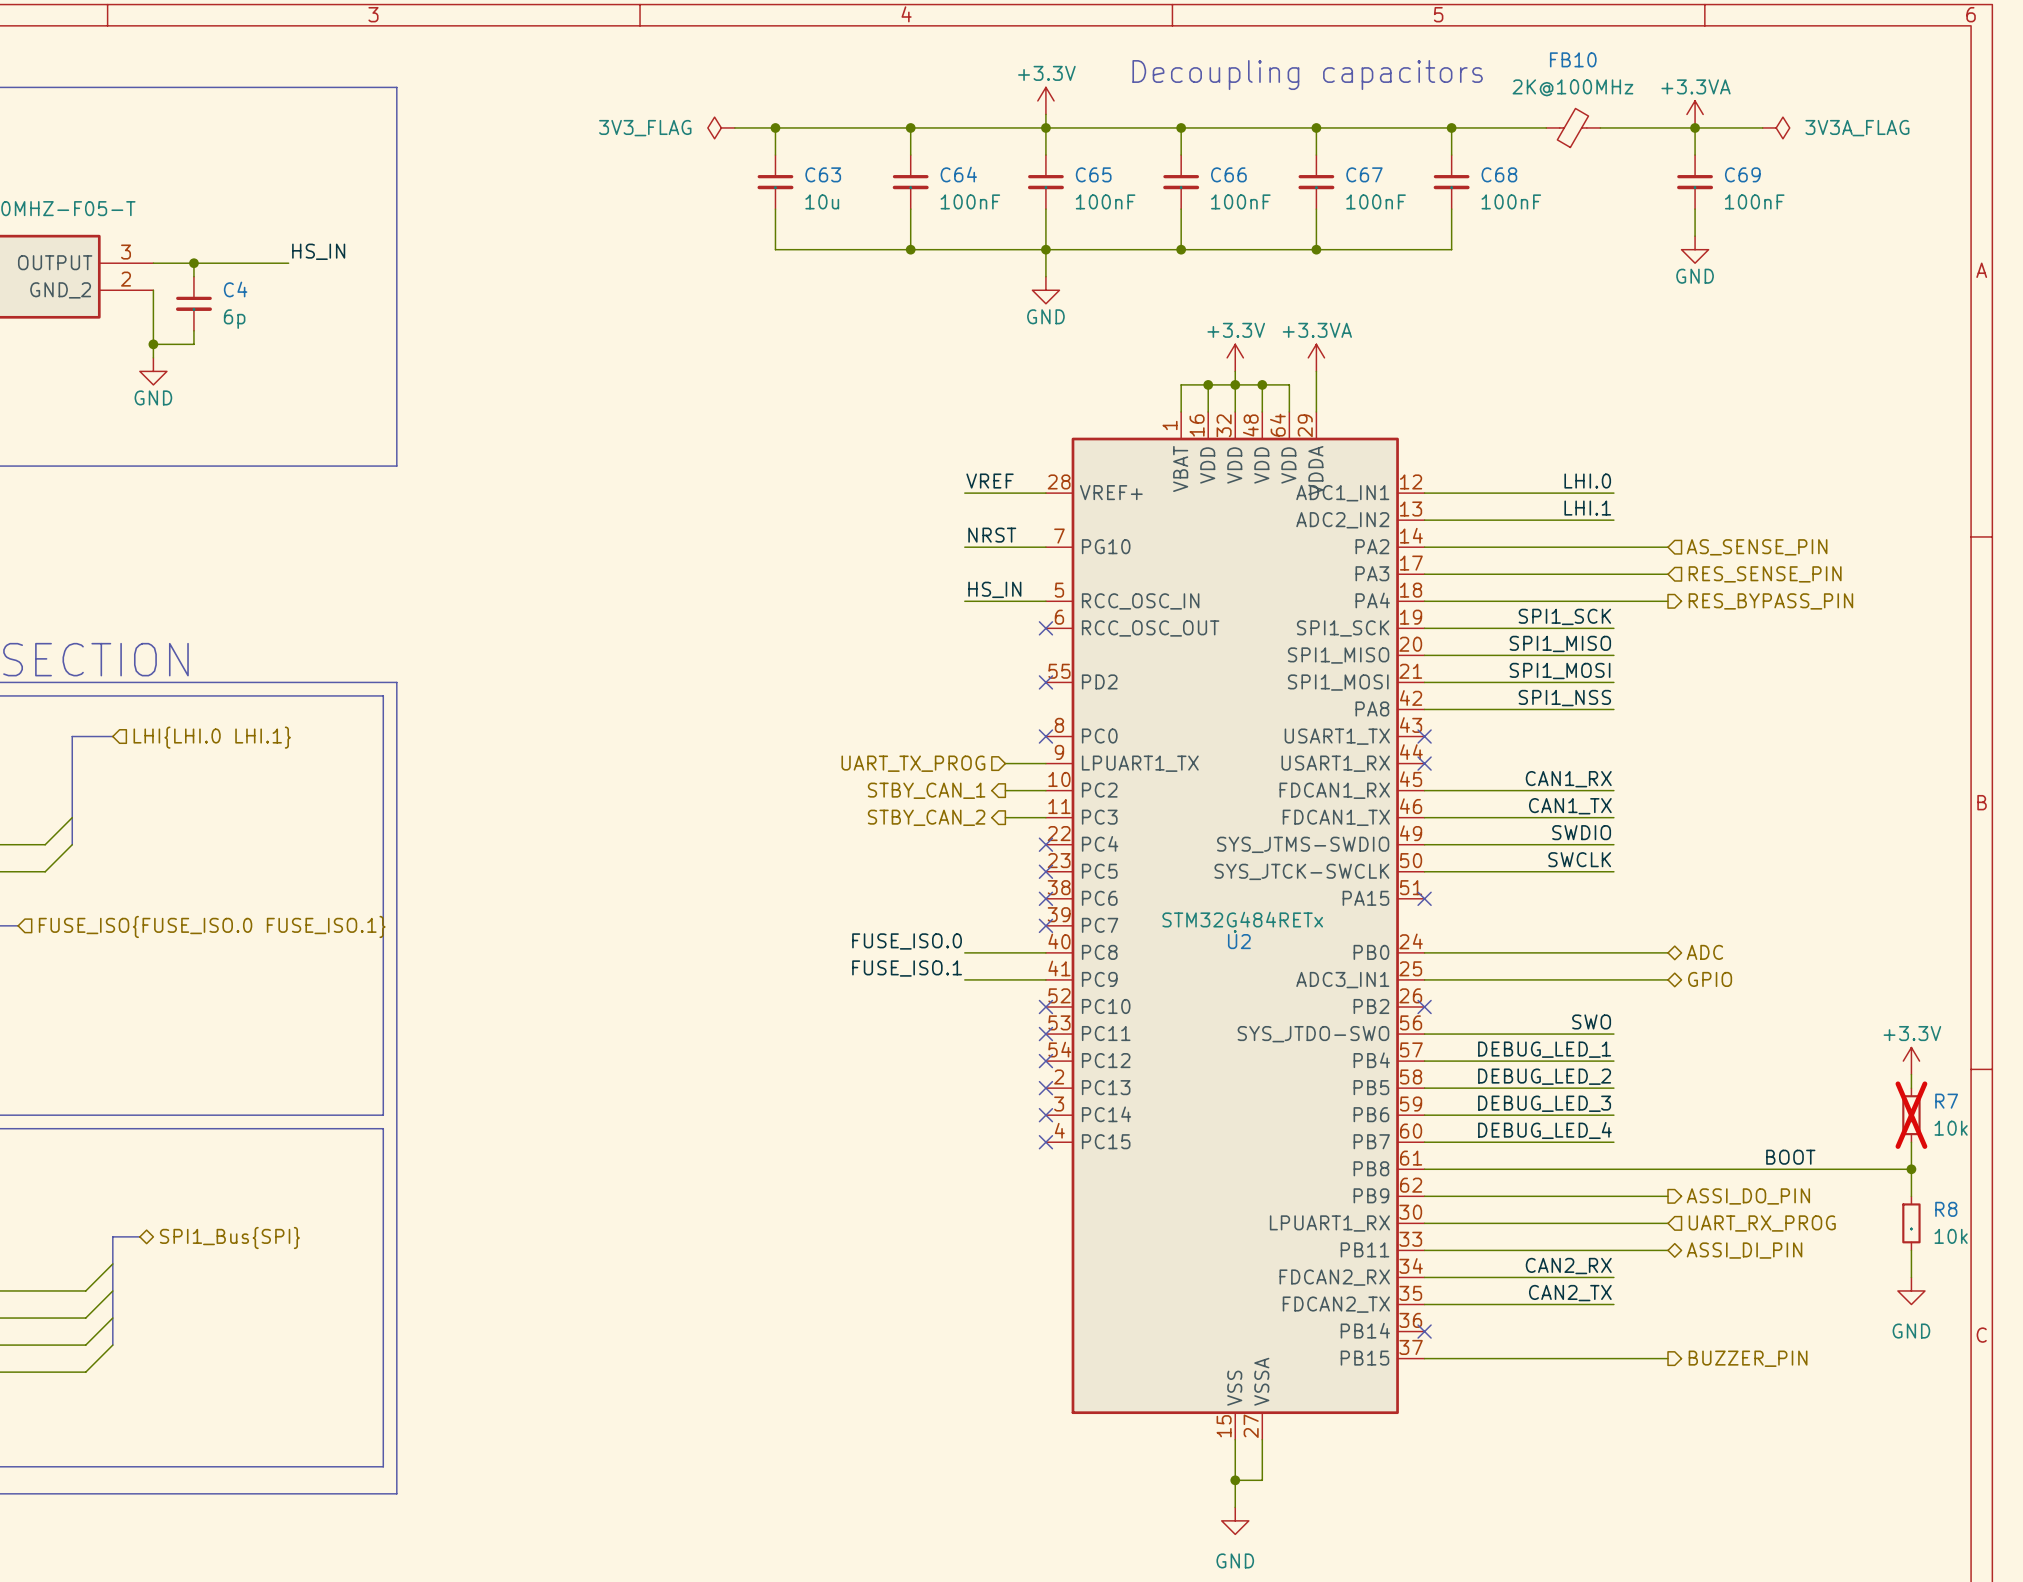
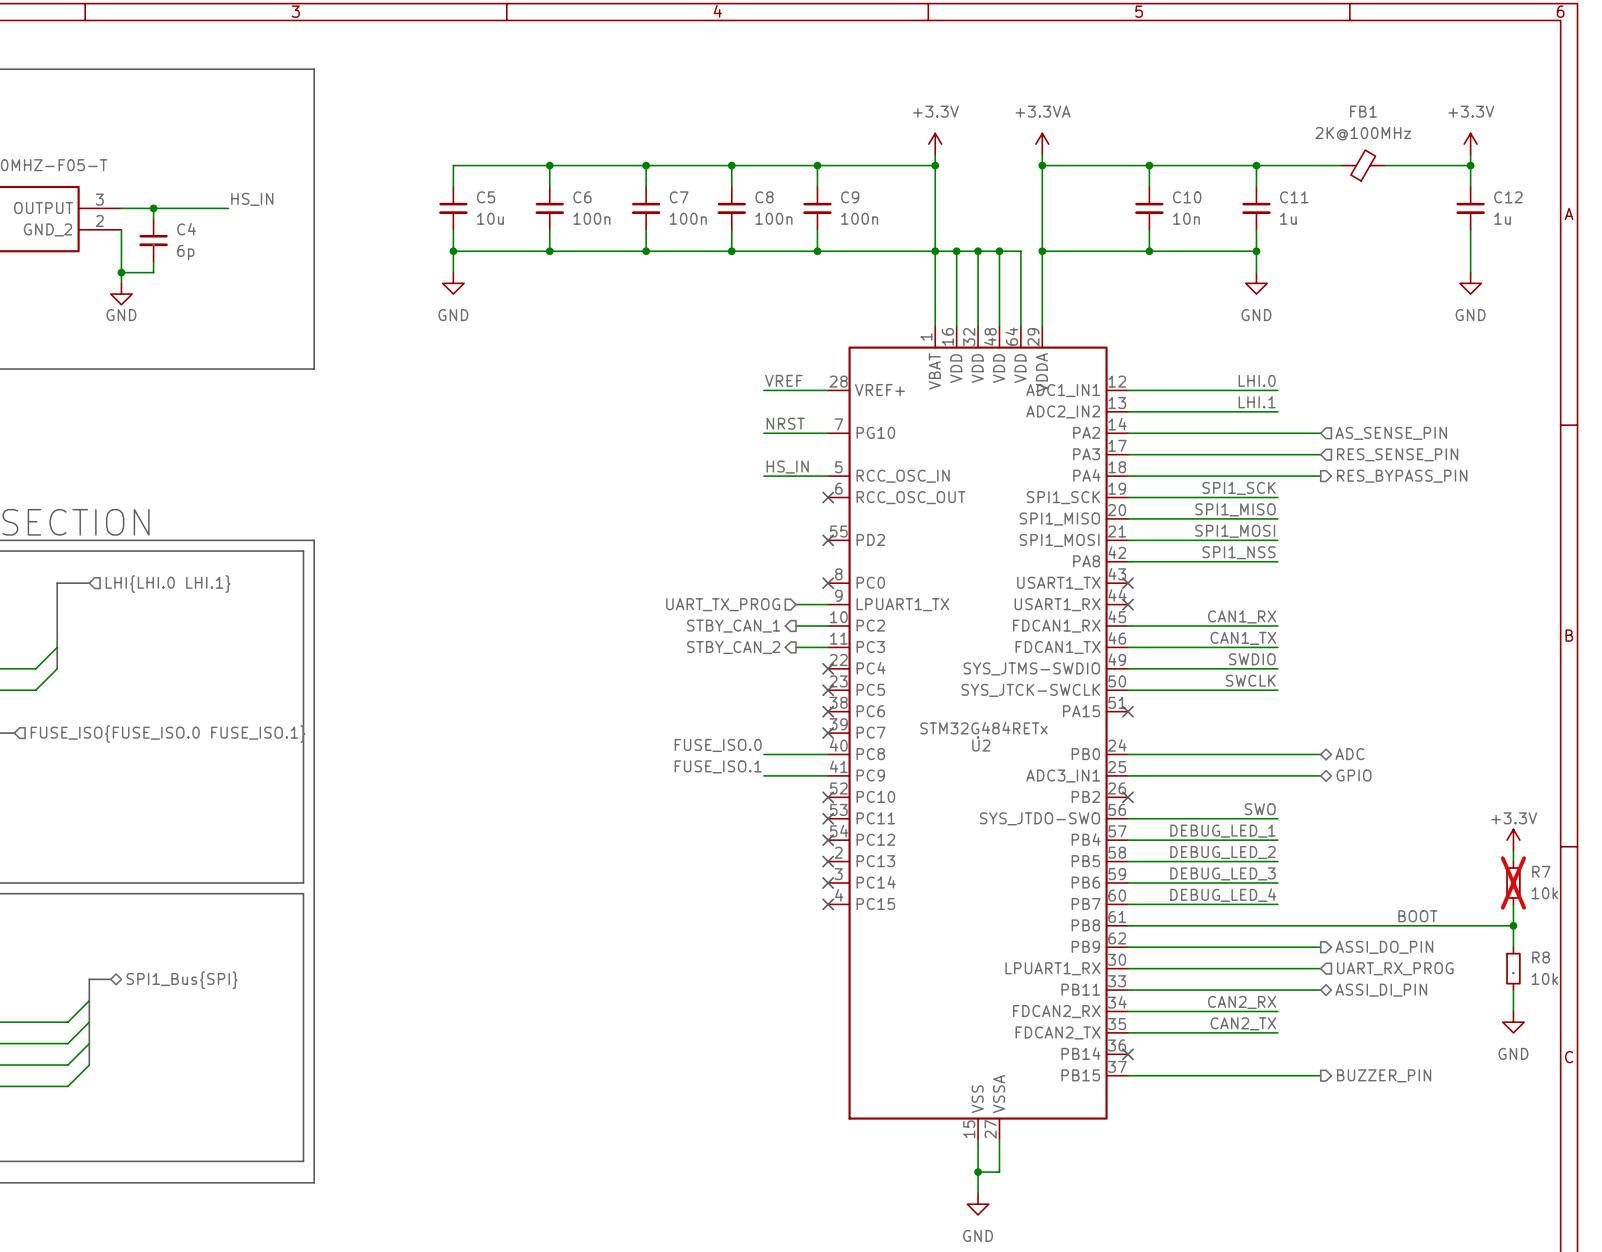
text: Decoupling capacitors (1307, 75) -> none
power symbol: +3.3V (1045, 100) -> none
wire: (1045, 114) (1045, 155) -> none
power symbol: +3.3VA (1695, 114) -> none
power symbol: 3V3_FLAG (721, 127) -> none
wire: (734, 127) (1546, 127) -> none
wire: (775, 127) (775, 155) -> (646, 165) (646, 186)
junction: (775, 127) -> none
wire: (910, 127) (910, 155) -> (731, 165) (731, 186)
junction: (910, 127) -> none
junction: (1045, 127) -> none
wire: (1181, 127) (1181, 155) -> (817, 165) (817, 186)
junction: (1181, 127) -> none
wire: (1316, 127) (1316, 155) -> none
junction: (1316, 127) -> none
wire: (1451, 127) (1451, 155) -> (1149, 229) (1149, 251)
junction: (1451, 127) -> none
FB10: 2K@100MHz (1573, 127) -> none
wire: (1600, 127) (1762, 127) -> none
wire: (1695, 127) (1695, 155) -> (1256, 165) (1256, 186)
junction: (1695, 127) -> none
power symbol: 3V3A_FLAG (1776, 127) -> none
C63: 10u (775, 182) -> none
C64: 100nF (910, 182) -> none
C65: 100nF (1045, 182) -> none
power symbol: none -> +3.3V (935, 144)
C66: 100nF (1181, 182) -> none
C67: 100nF (1316, 182) -> none
C68: 100nF (1451, 182) -> none
C69: 100nF (1695, 182) -> none
power symbol: none -> +3.3V (1470, 144)
wire: none -> (935, 154) (935, 165) (453, 165) (453, 186)
wire: none -> (1470, 154) (1470, 186)
wire: none -> (549, 165) (549, 186)
junction: none -> (549, 165)
wire: (775, 209) (775, 249) (1451, 249) (1451, 236) -> none
junction: none -> (646, 165)
wire: (910, 209) (910, 249) -> none
junction: none -> (731, 165)
junction: none -> (817, 165)
wire: (1045, 209) (1045, 276) -> (956, 251) (956, 304)
junction: none -> (935, 165)
junction: none -> (1042, 165)
junction: none -> (1149, 165)
junction: none -> (1256, 165)
wire: (1695, 209) (1695, 236) -> (1342, 165) (1042, 165) (1042, 154)
FB1: none -> 2K@100MHz (1363, 165)
wire: none -> (1384, 165) (1470, 165)
junction: none -> (1470, 165)
junction: (910, 249) -> none
junction: (1045, 249) -> none
junction: (1181, 249) -> none
wire: none -> (1042, 197) (1042, 294)
junction: (1316, 249) -> none
power symbol: GND (1695, 249) -> none
C5: none -> 10u (453, 208)
C6: none -> 100n (549, 208)
C7: none -> 100n (646, 208)
C8: none -> 100n (731, 208)
C9: none -> 100n (817, 208)
C10: none -> 10n (1149, 208)
C11: none -> 1u (1256, 208)
C12: none -> 1u (1470, 208)
wire: none -> (453, 229) (453, 272)
wire: none -> (549, 229) (549, 251)
wire: none -> (646, 229) (646, 251)
wire: none -> (731, 229) (731, 251)
wire: none -> (817, 229) (817, 251)
power symbol: GND (1045, 290) -> none
wire: none -> (1256, 229) (1256, 272)
wire: none -> (1470, 229) (1470, 272)
wire: none -> (453, 251) (1020, 251) (1020, 304)
junction: none -> (453, 251)
junction: none -> (549, 251)
junction: none -> (646, 251)
junction: none -> (731, 251)
junction: none -> (817, 251)
junction: none -> (935, 251)
junction: none -> (956, 251)
junction: none -> (978, 251)
wire: none -> (999, 251) (999, 304)
junction: none -> (999, 251)
wire: none -> (1042, 251) (1256, 251)
junction: none -> (1042, 251)
junction: none -> (1149, 251)
junction: none -> (1256, 251)
power symbol text position: +3.3VA (1317, 330) -> +3.3VA (1043, 111)
power symbol: none -> GND (453, 283)
power symbol: +3.3V (1235, 357) -> none
power symbol position: +3.3VA (1316, 357) -> +3.3VA (1042, 144)
power symbol: none -> GND (1256, 283)
power symbol: none -> GND (1470, 283)
wire: (1181, 384) (1289, 384) -> (935, 304) (935, 197)
junction: (1208, 384) -> none
junction: (1235, 384) -> none
junction: (1262, 384) -> none

